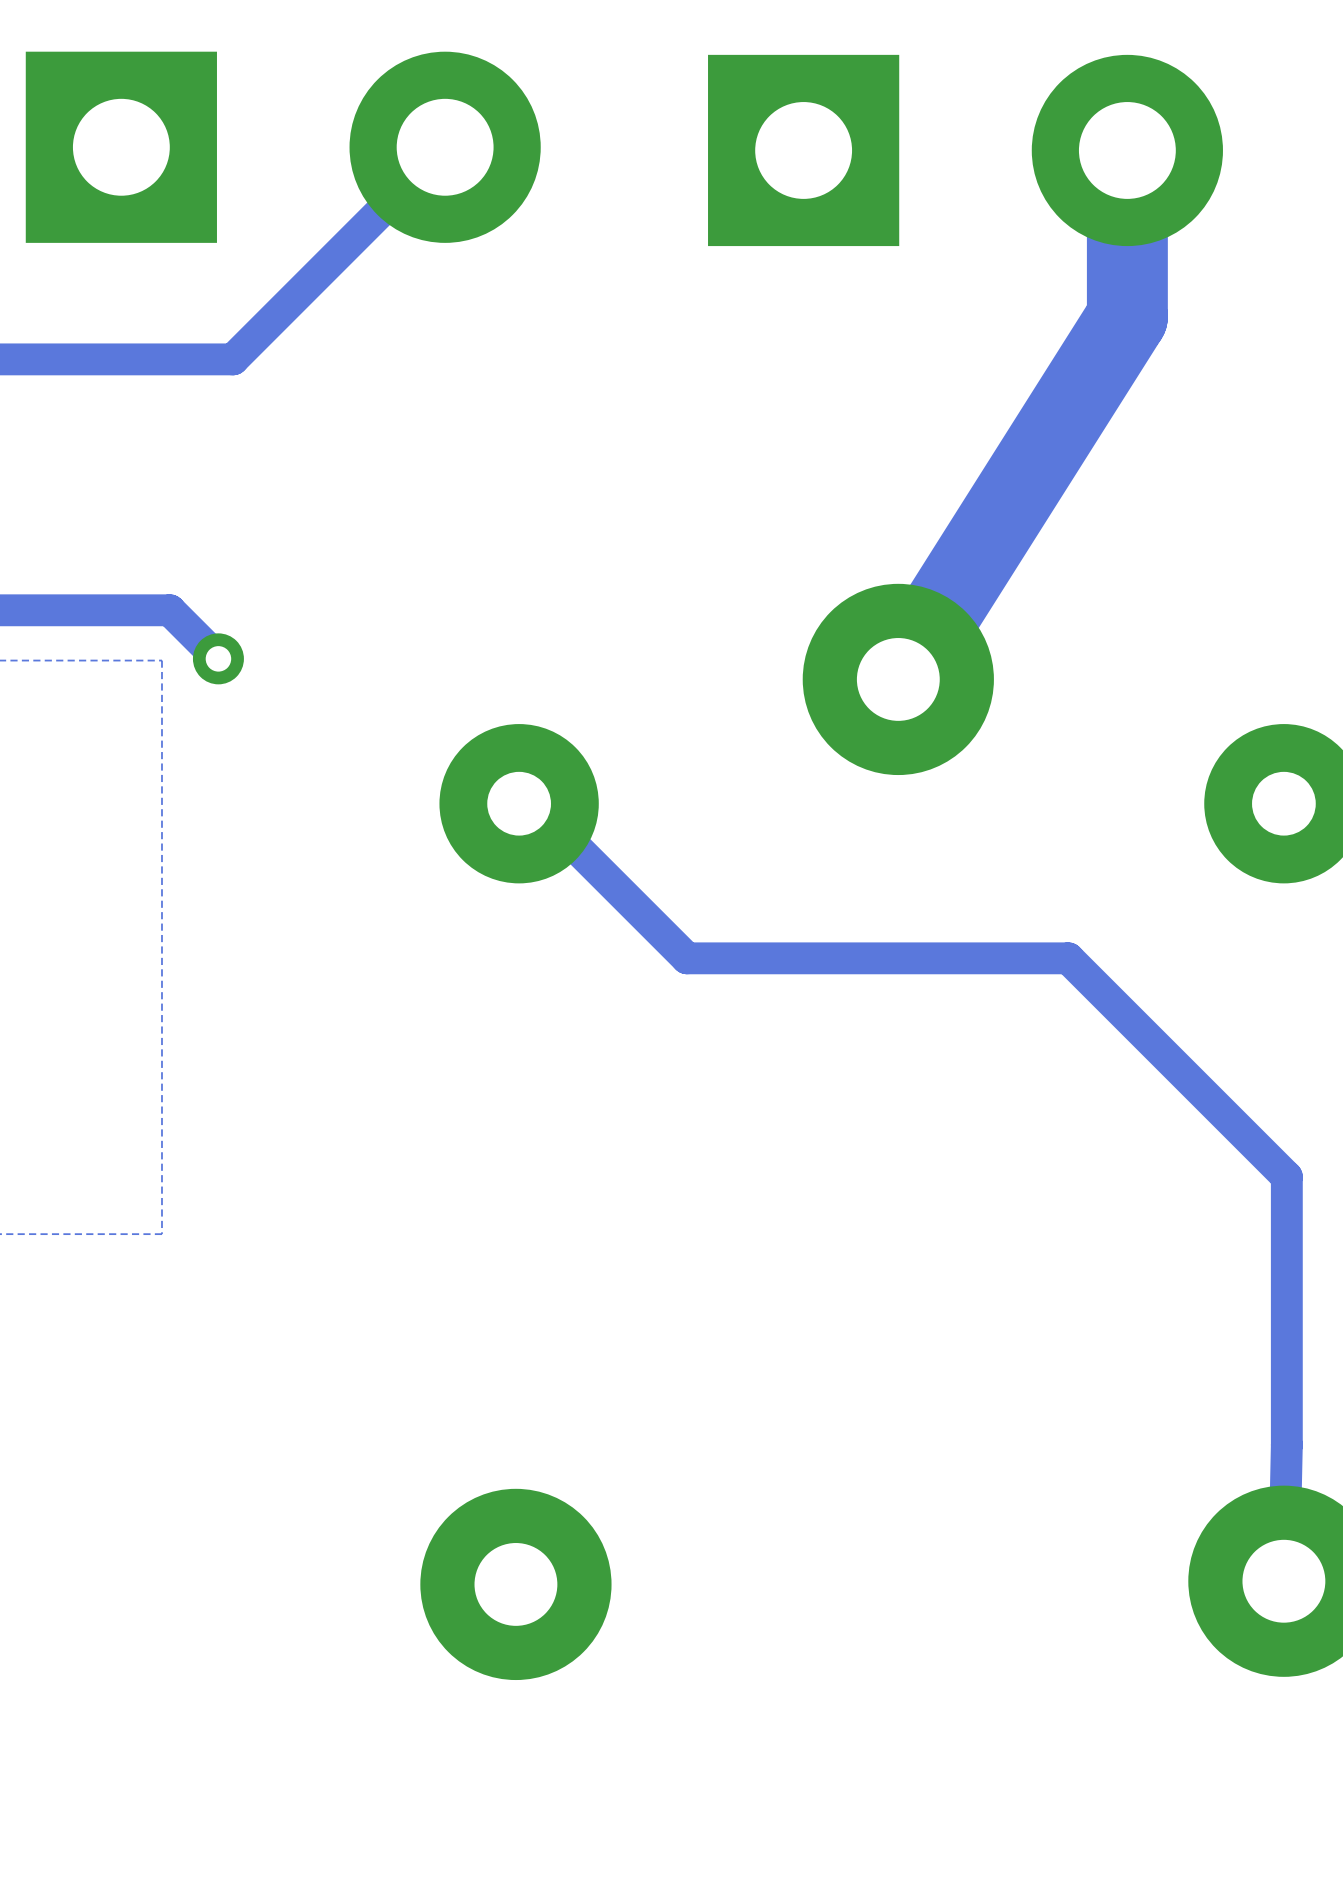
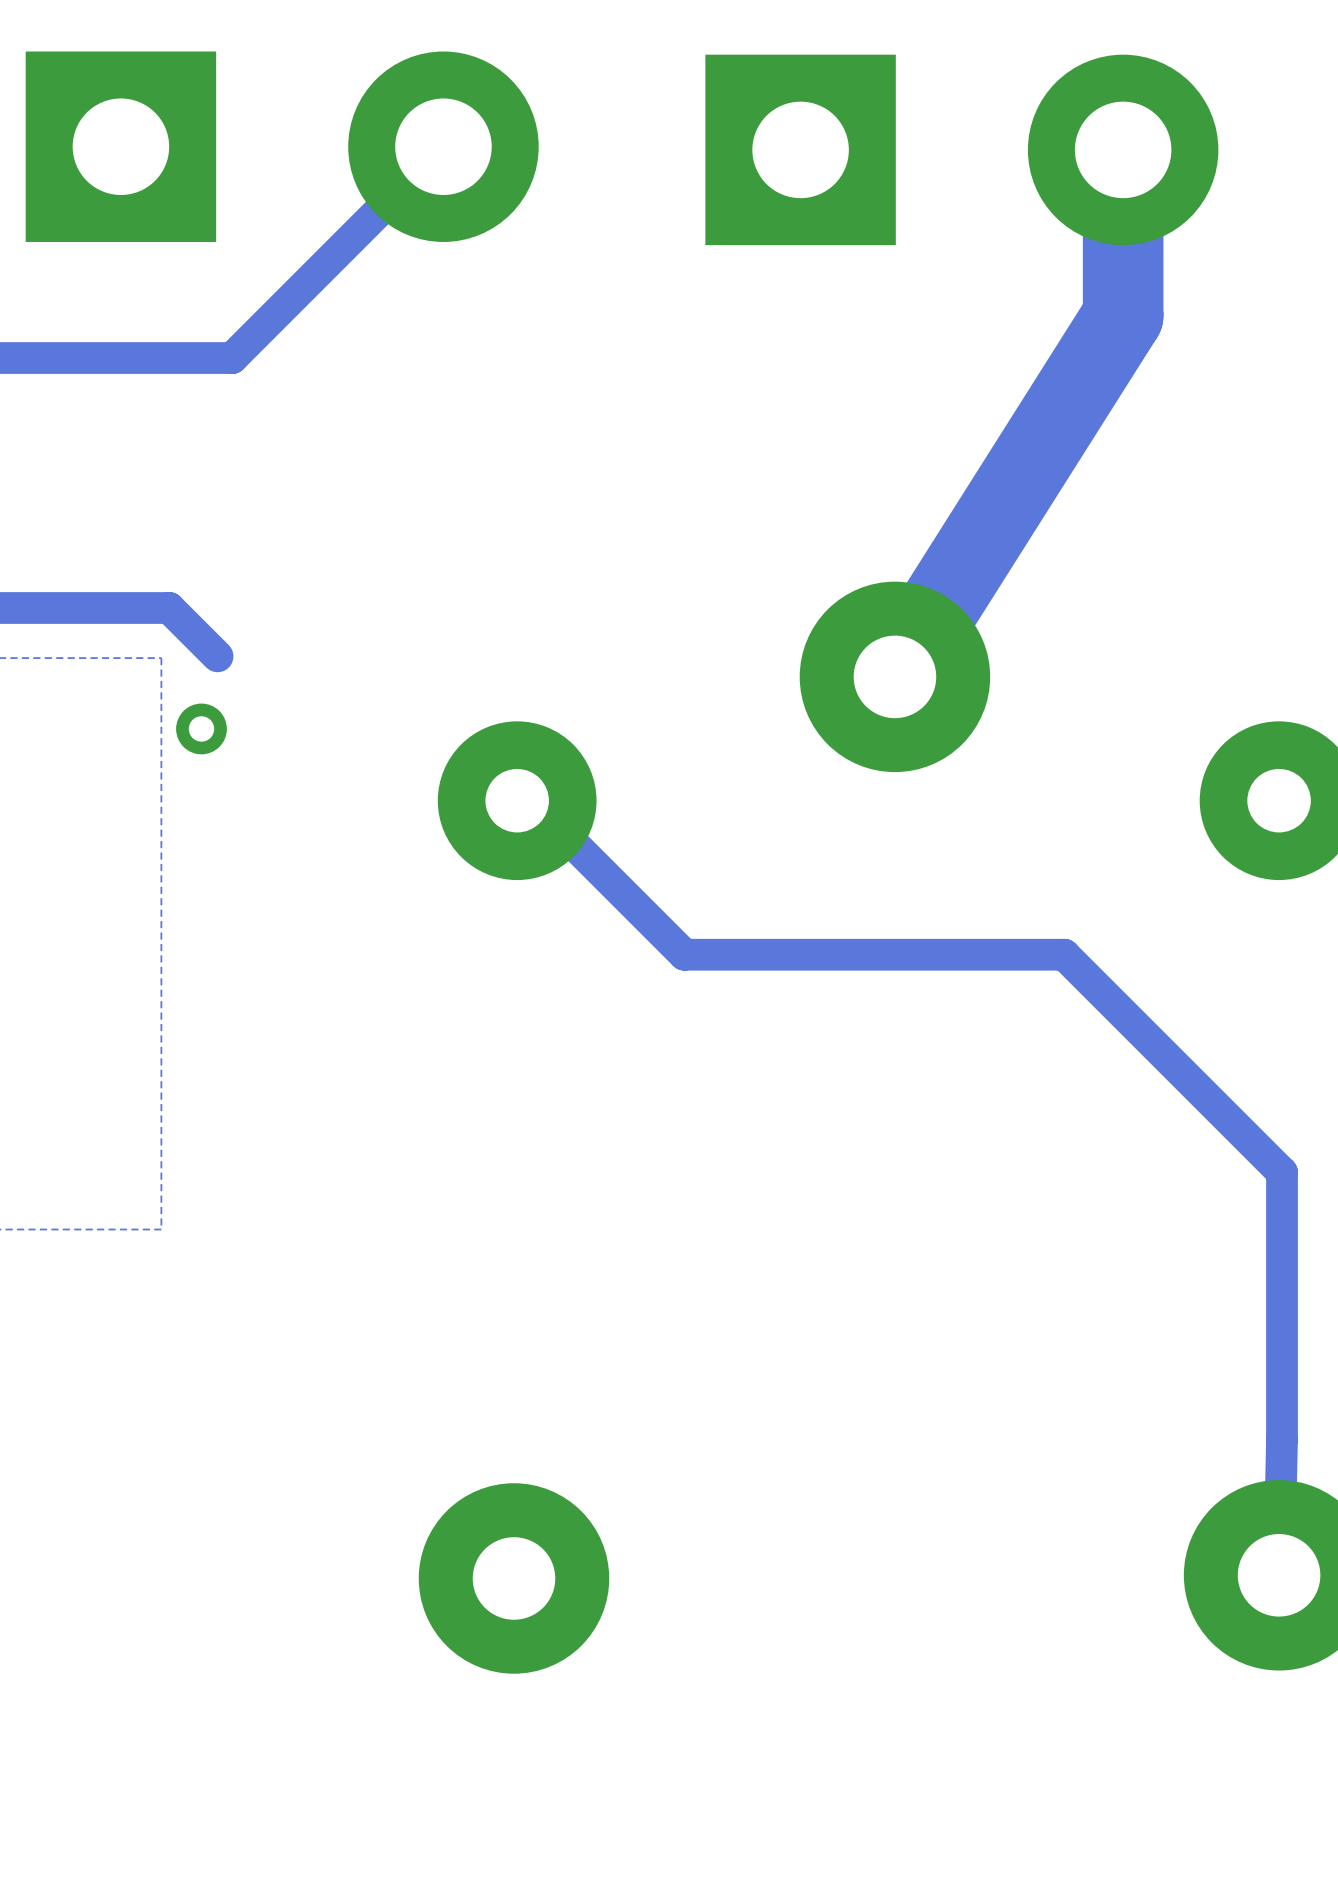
via position: (218, 658) -> (201, 728)

